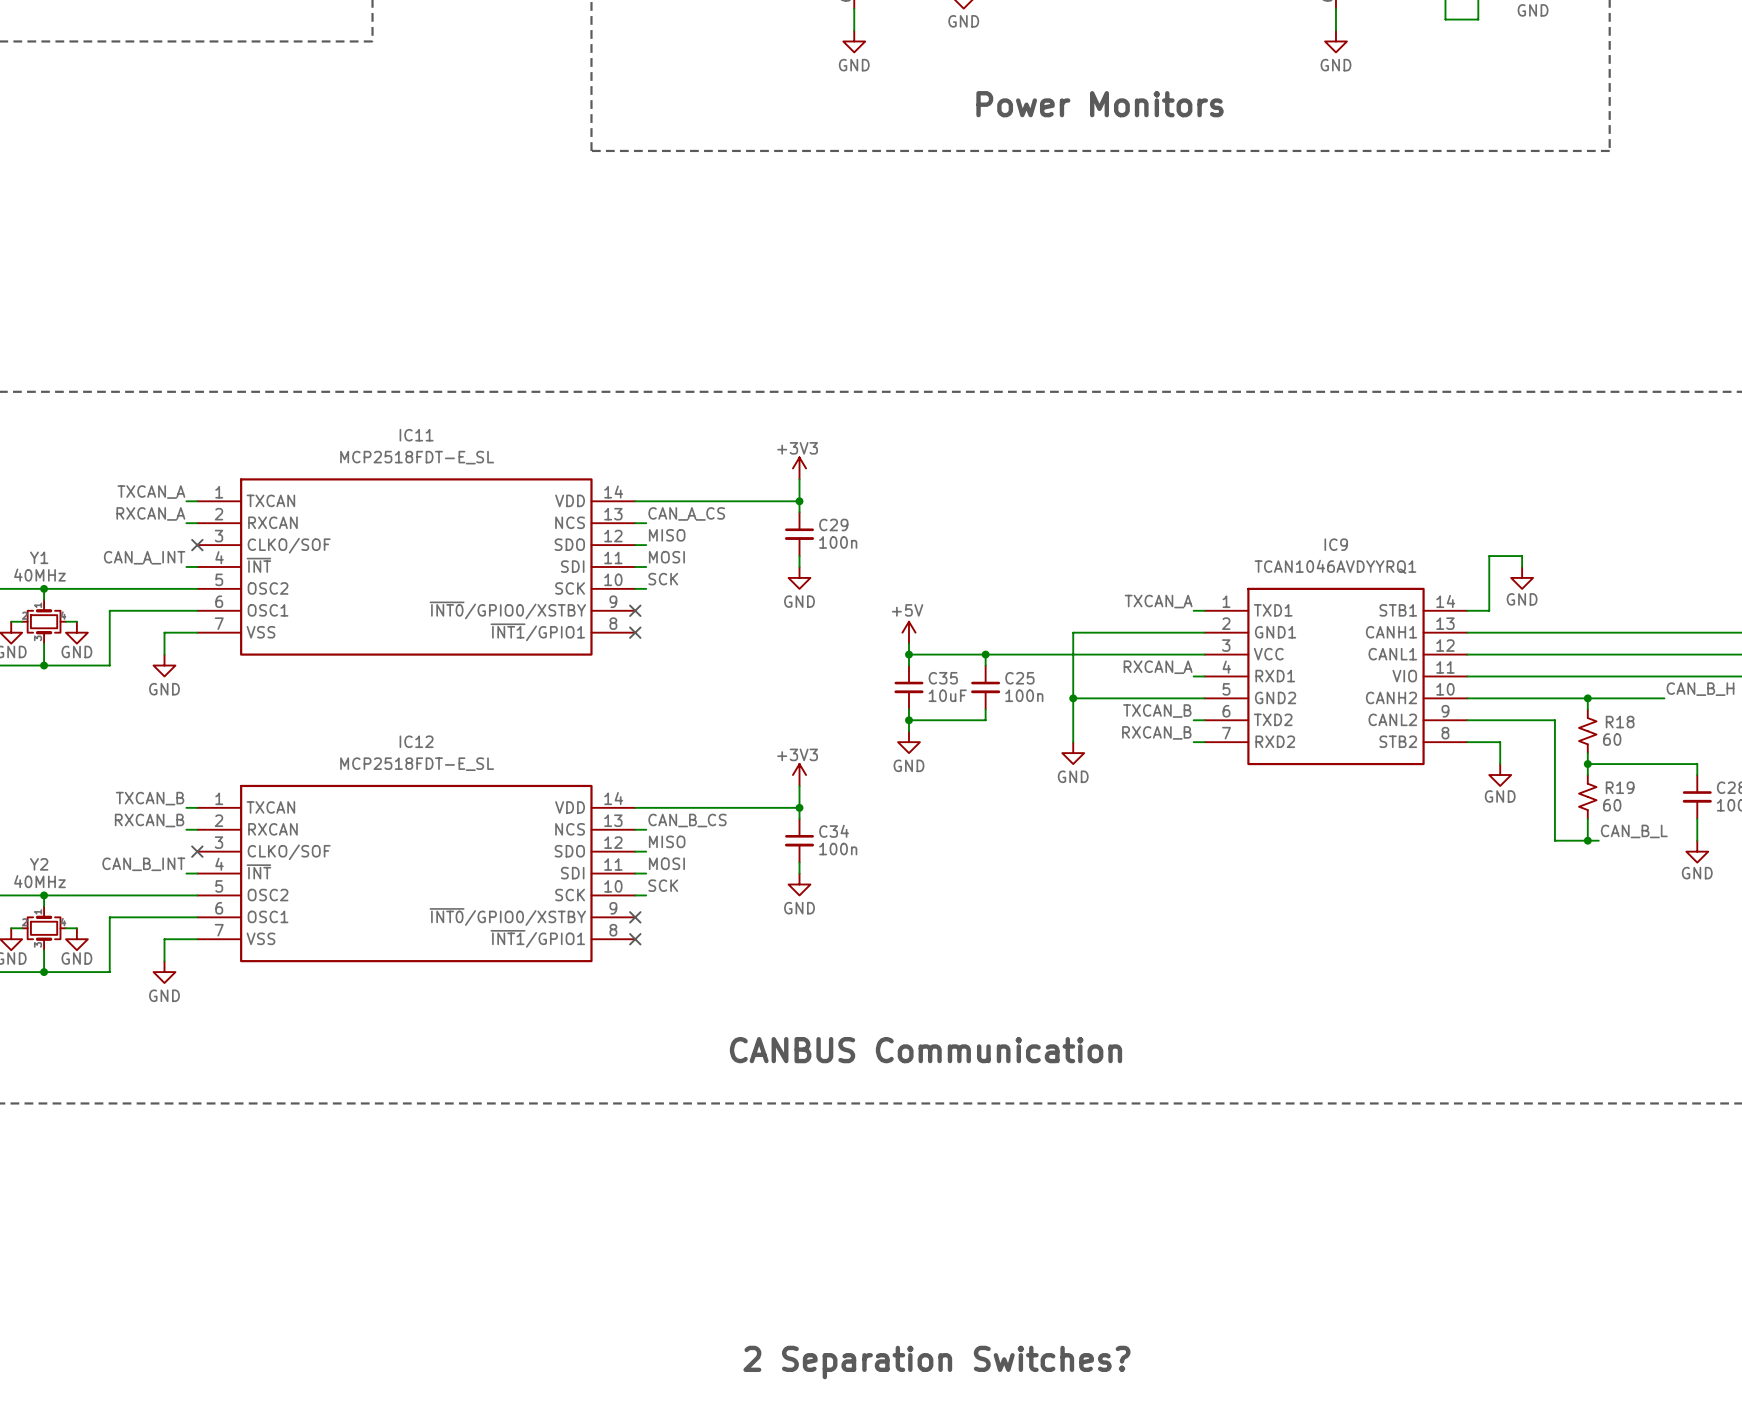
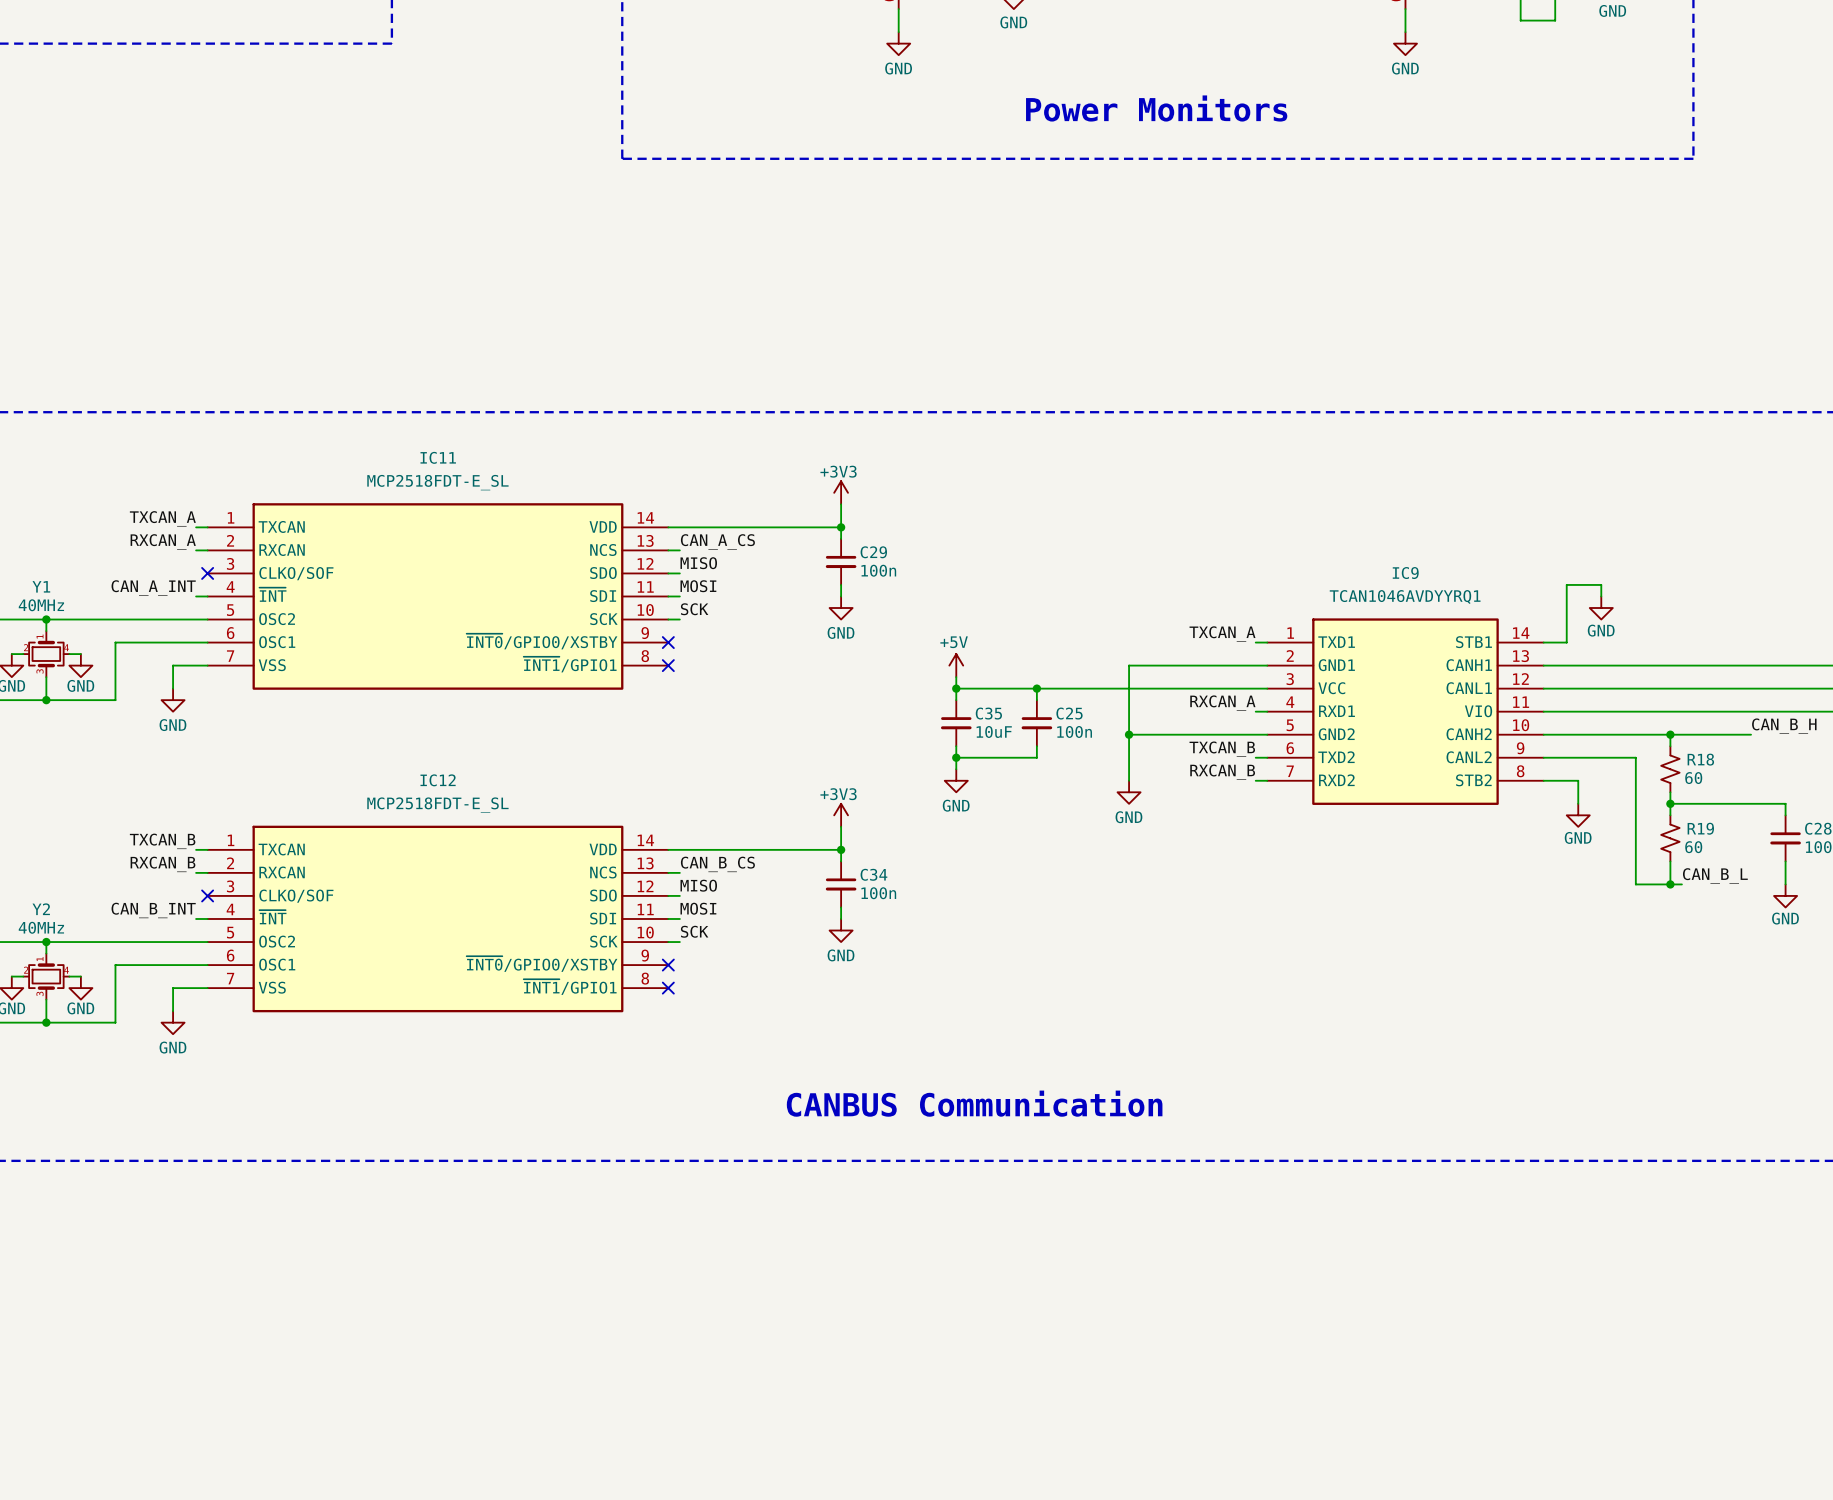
text: 2 Separation Switches? (936, 1362) -> none

